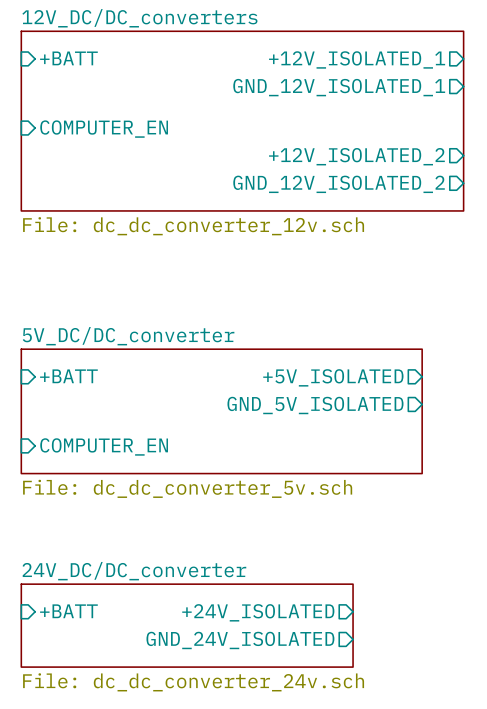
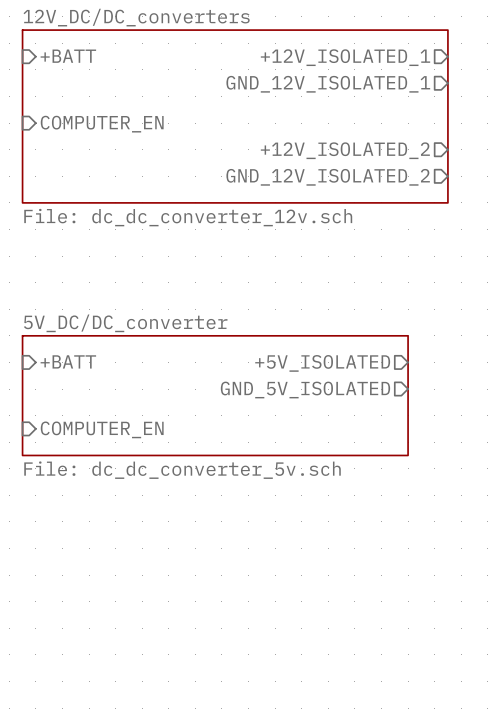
sheet pin: +BATT (68, 611) -> none
sheet pin: +24V_ISOLATED (258, 612) -> none
sheet 24V_DC/DC_converter: File: dc_dc_converter_24v.sch (187, 625) -> none
sheet pin: GND_24V_ISOLATED (240, 640) -> none

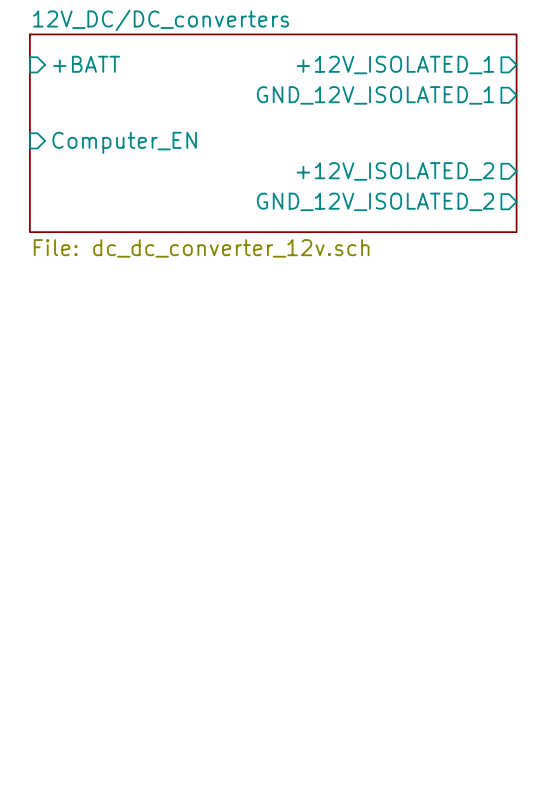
sheet pin: COMPUTER_EN (102, 124) -> Computer_EN (124, 142)
sheet pin: +BATT (68, 361) -> none
sheet pin: +5V_ISOLATED (322, 363) -> none
sheet pin: GND_5V_ISOLATED (305, 390) -> none
sheet 5V_DC/DC_converter: File: dc_dc_converter_5v.sch (215, 395) -> none
sheet pin: COMPUTER_EN (102, 429) -> none

